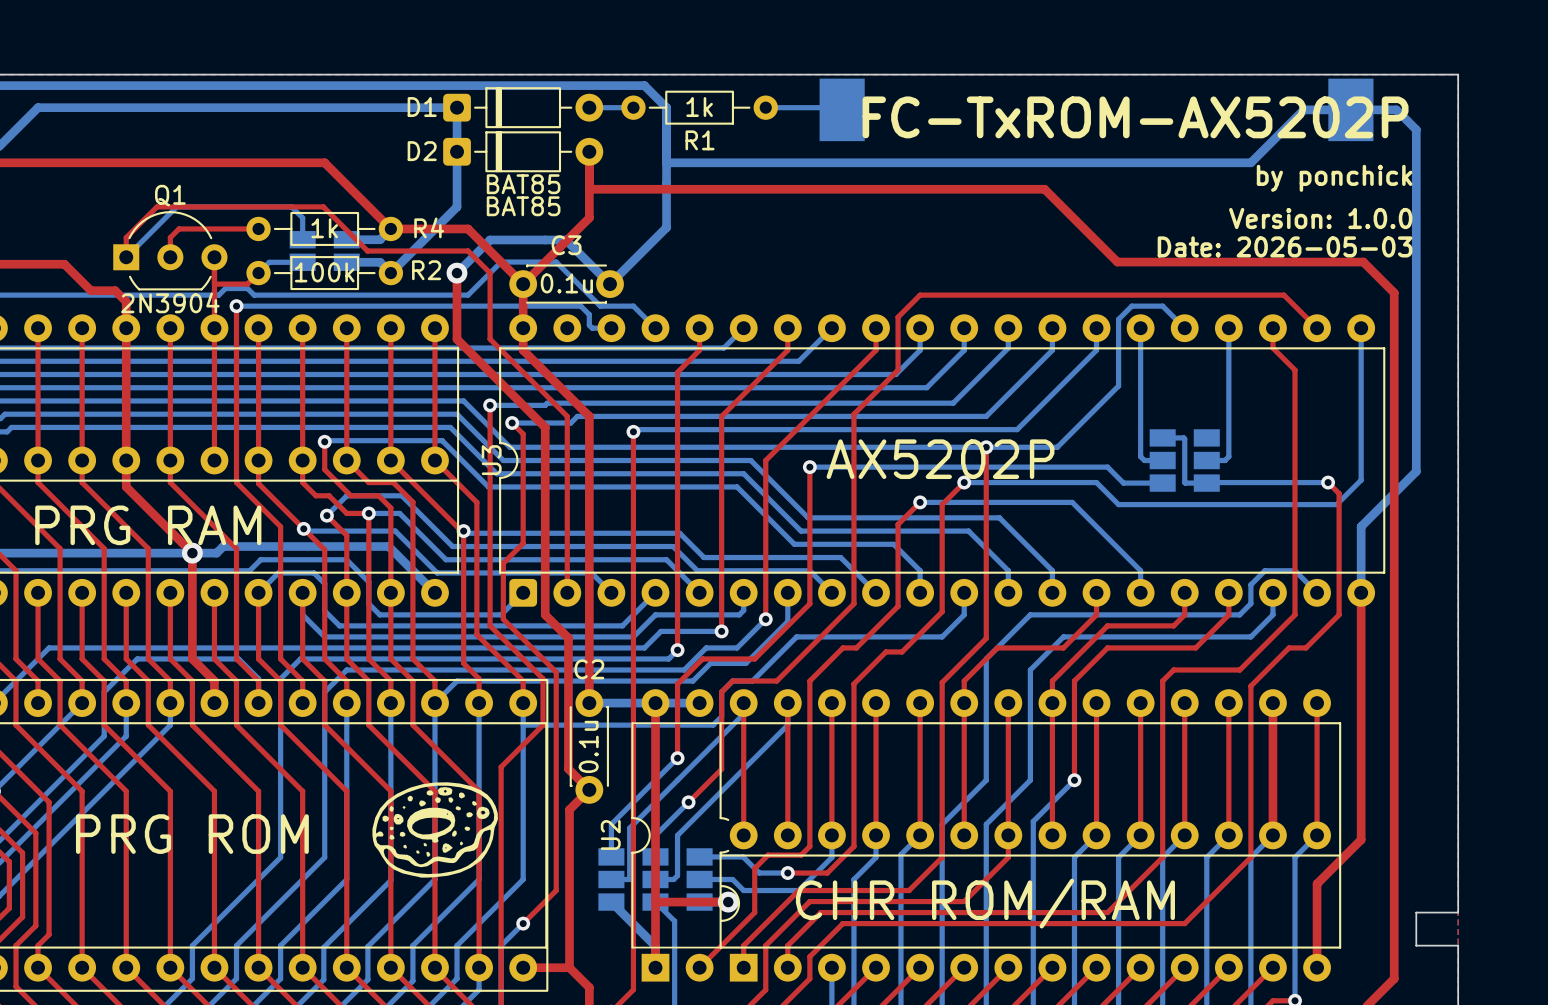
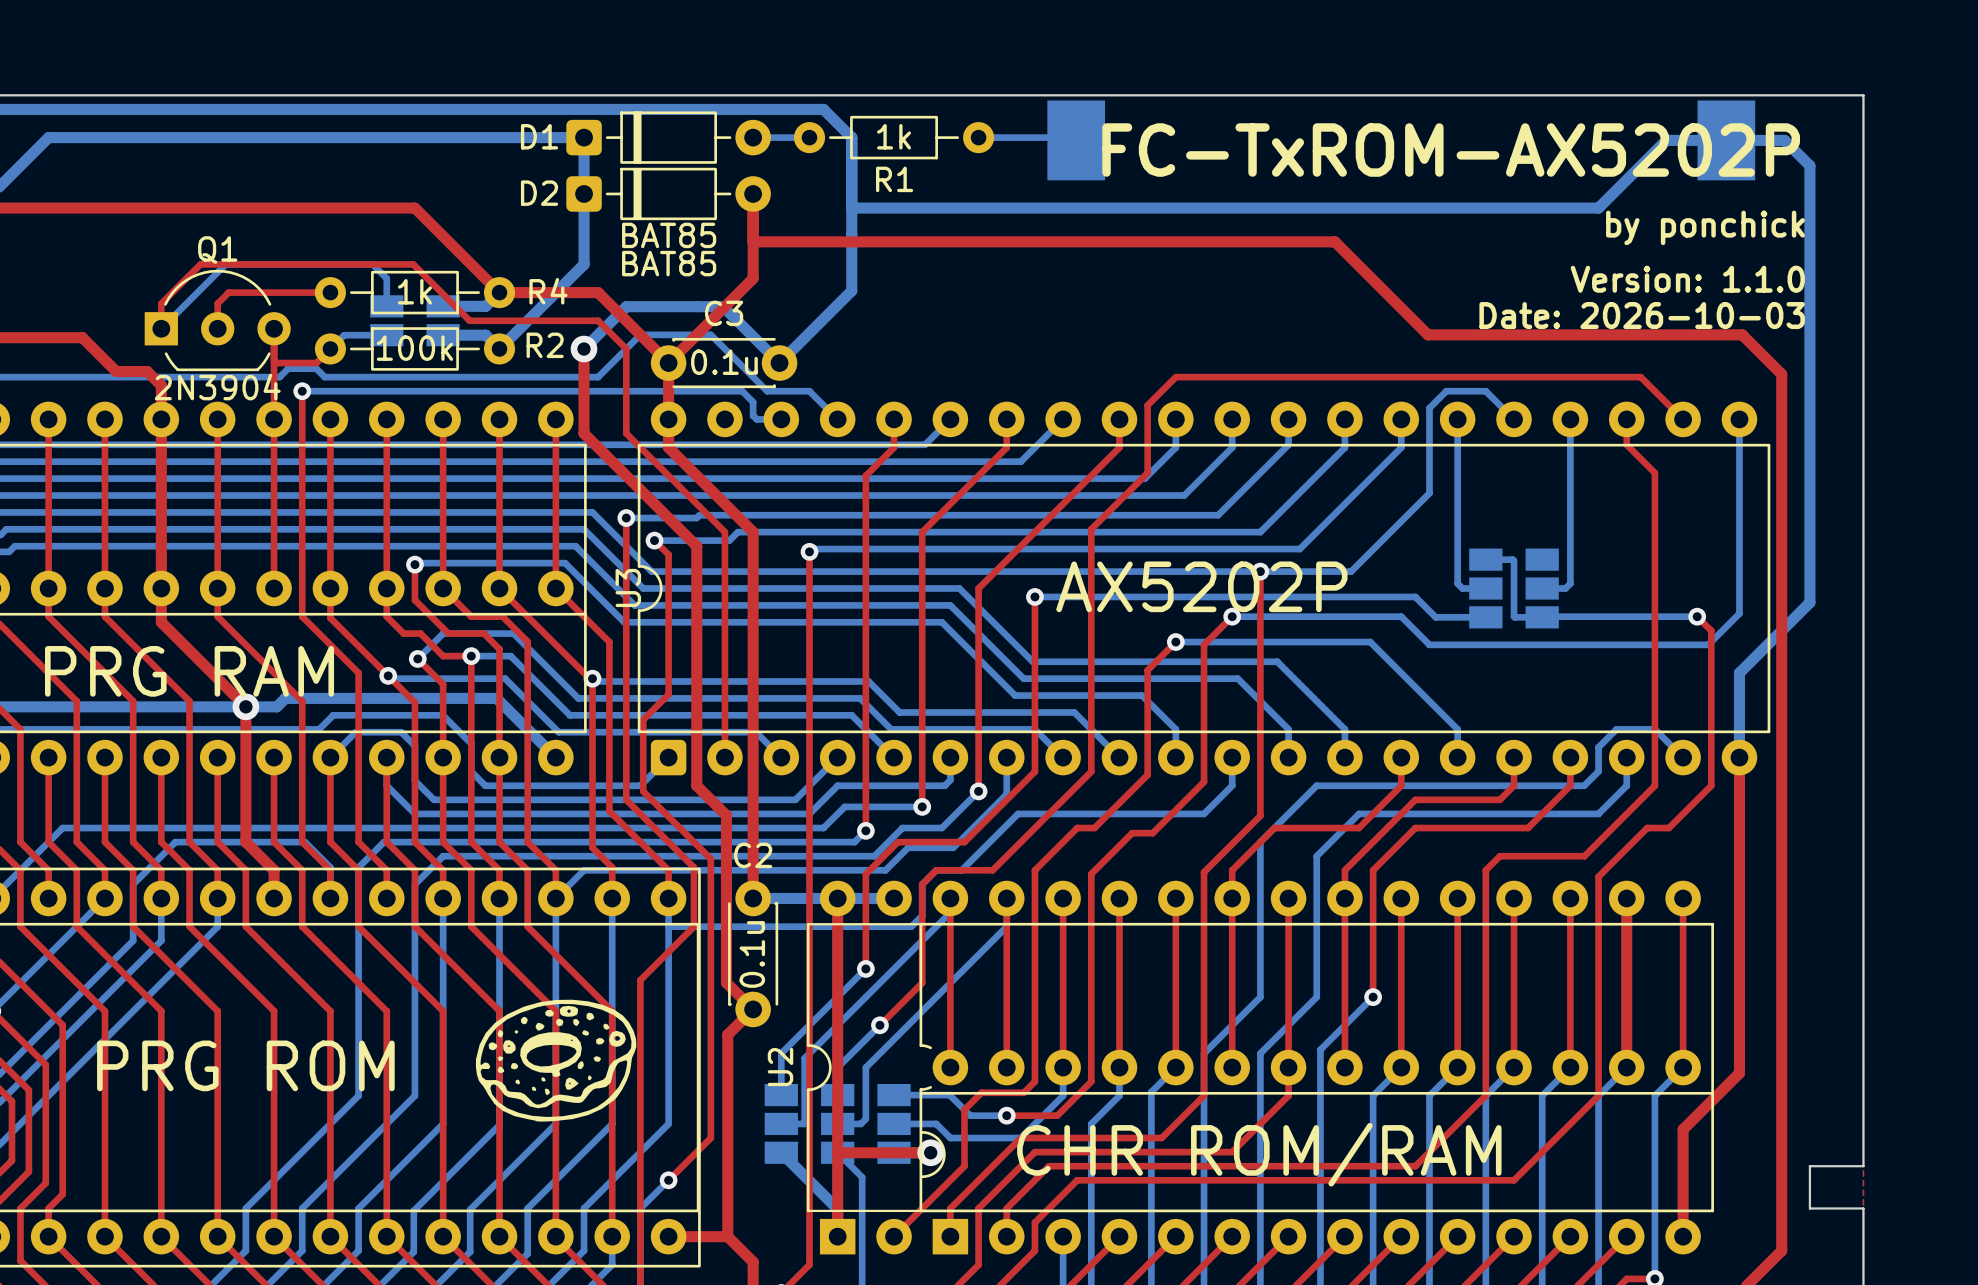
text: Version: 1.0.0 (1320, 218) -> Version: 1.1.0 (1687, 279)
text: Date: 2026-05-03 (1285, 246) -> Date: 2026-10-03 (1642, 315)

